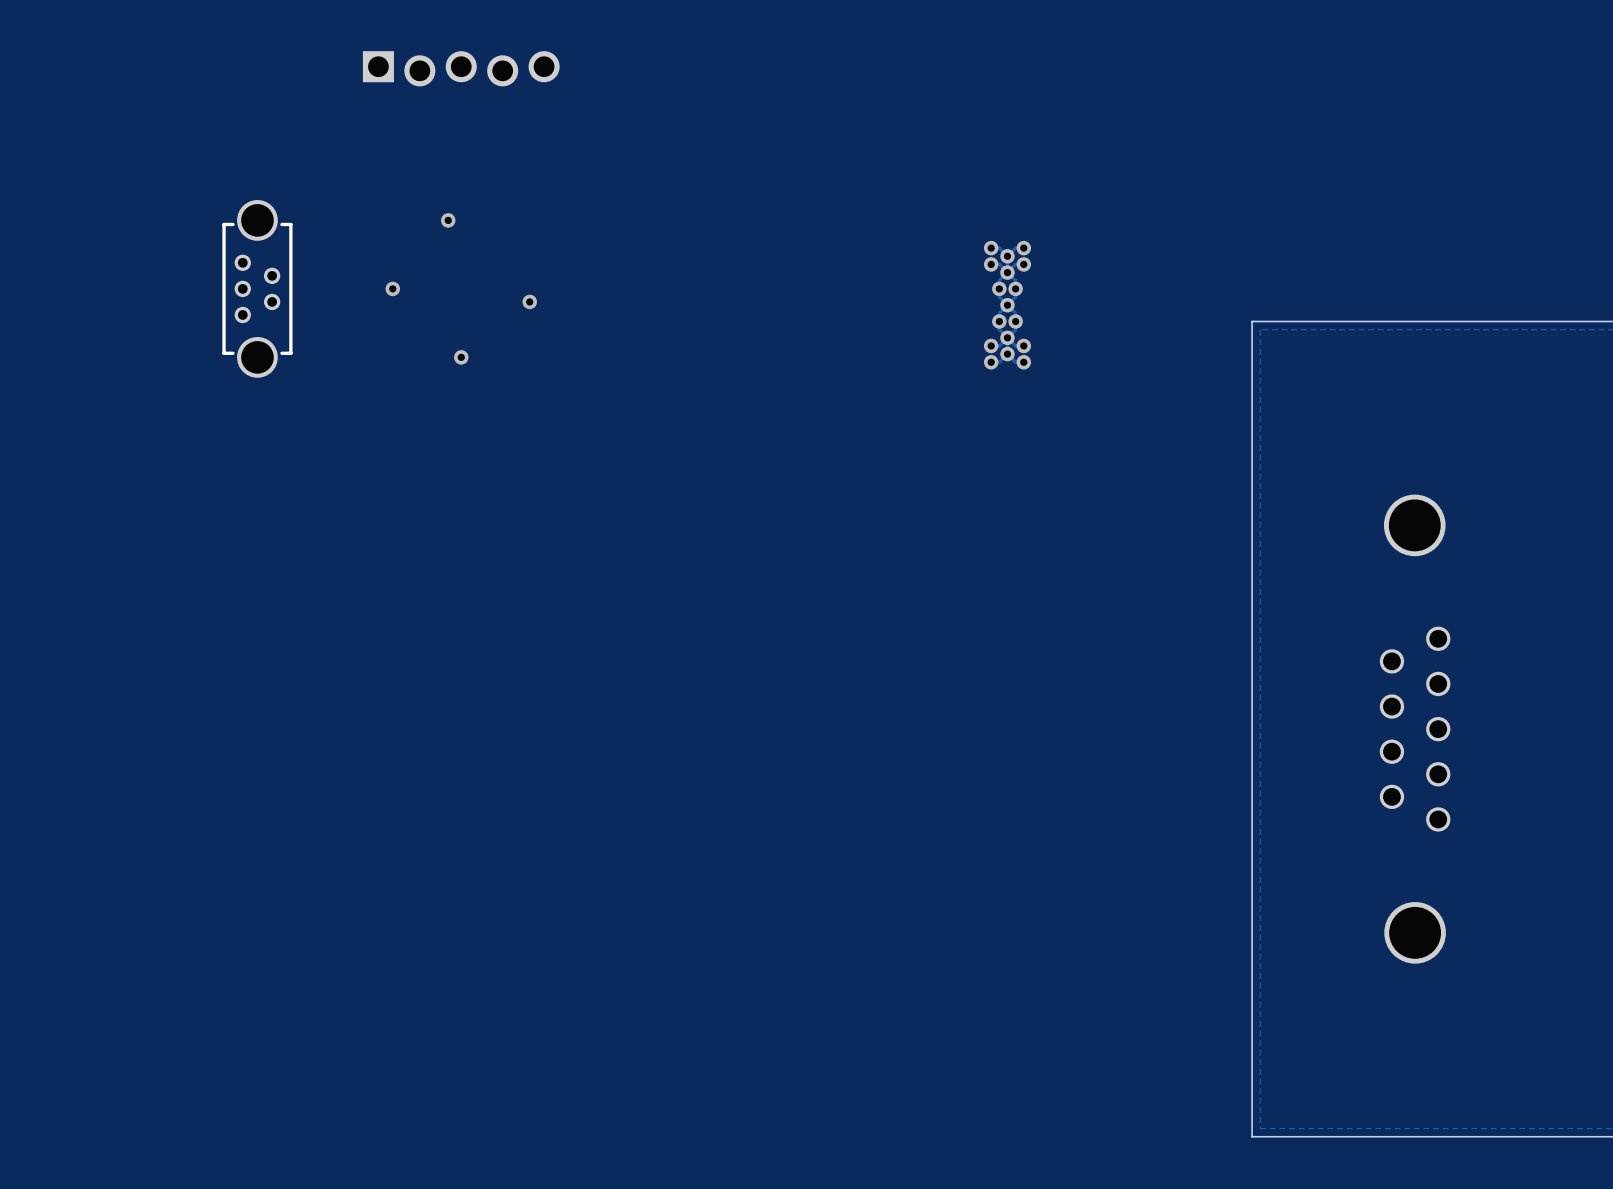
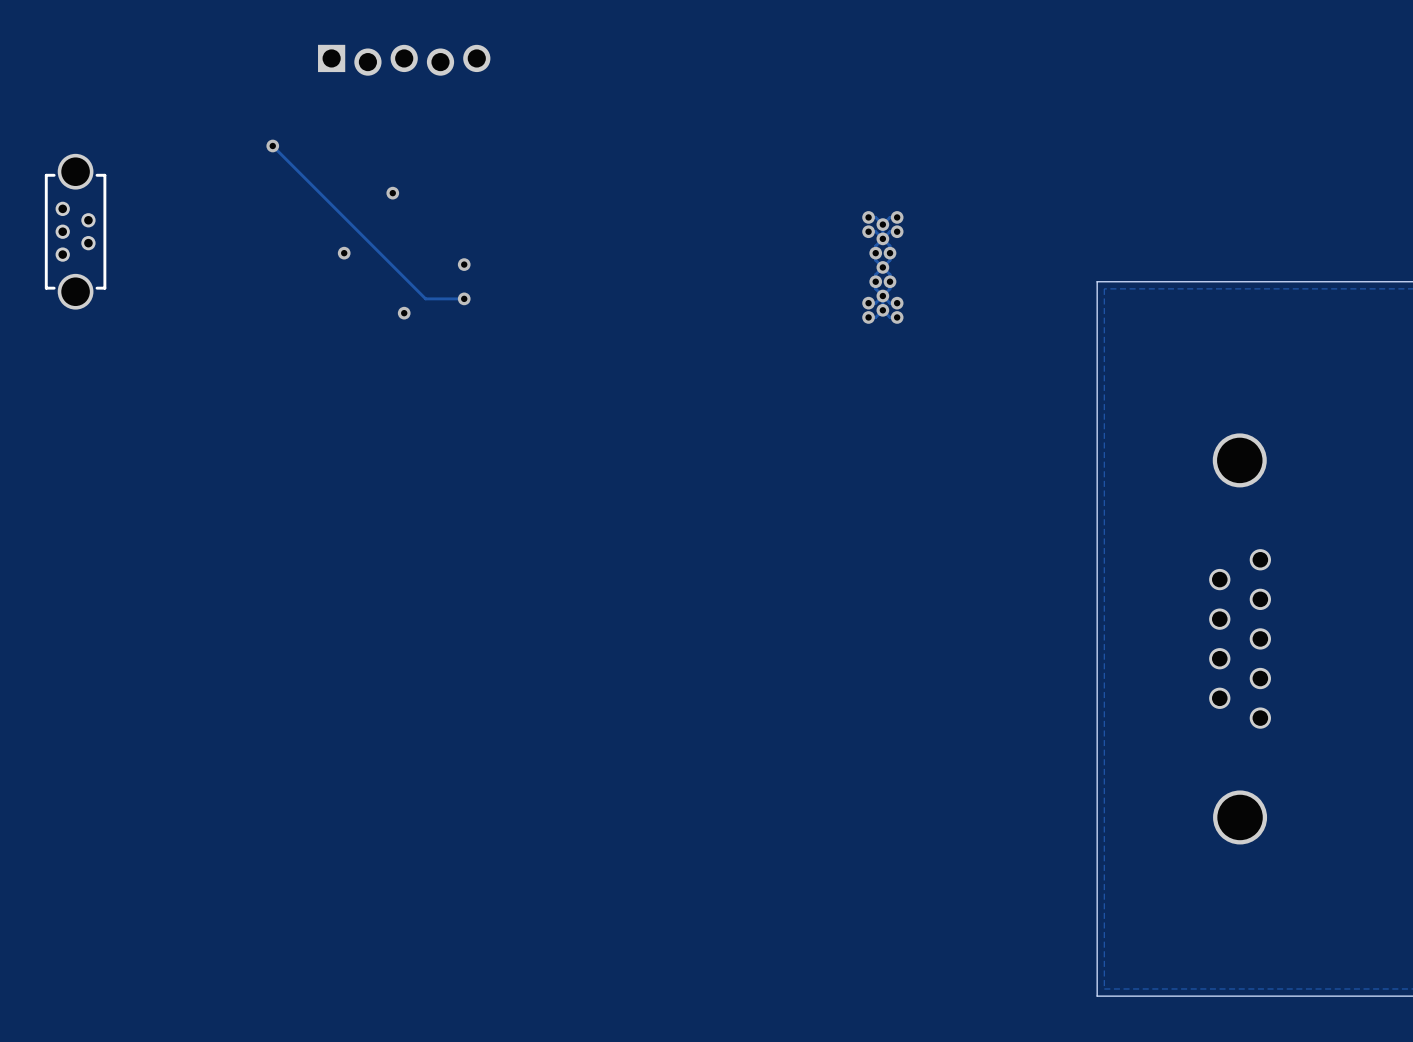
track: none -> (272, 145) (425, 298) (464, 298)
via: none -> (272, 145)
part position: (257, 288) -> (75, 231)
via: none -> (464, 298)

